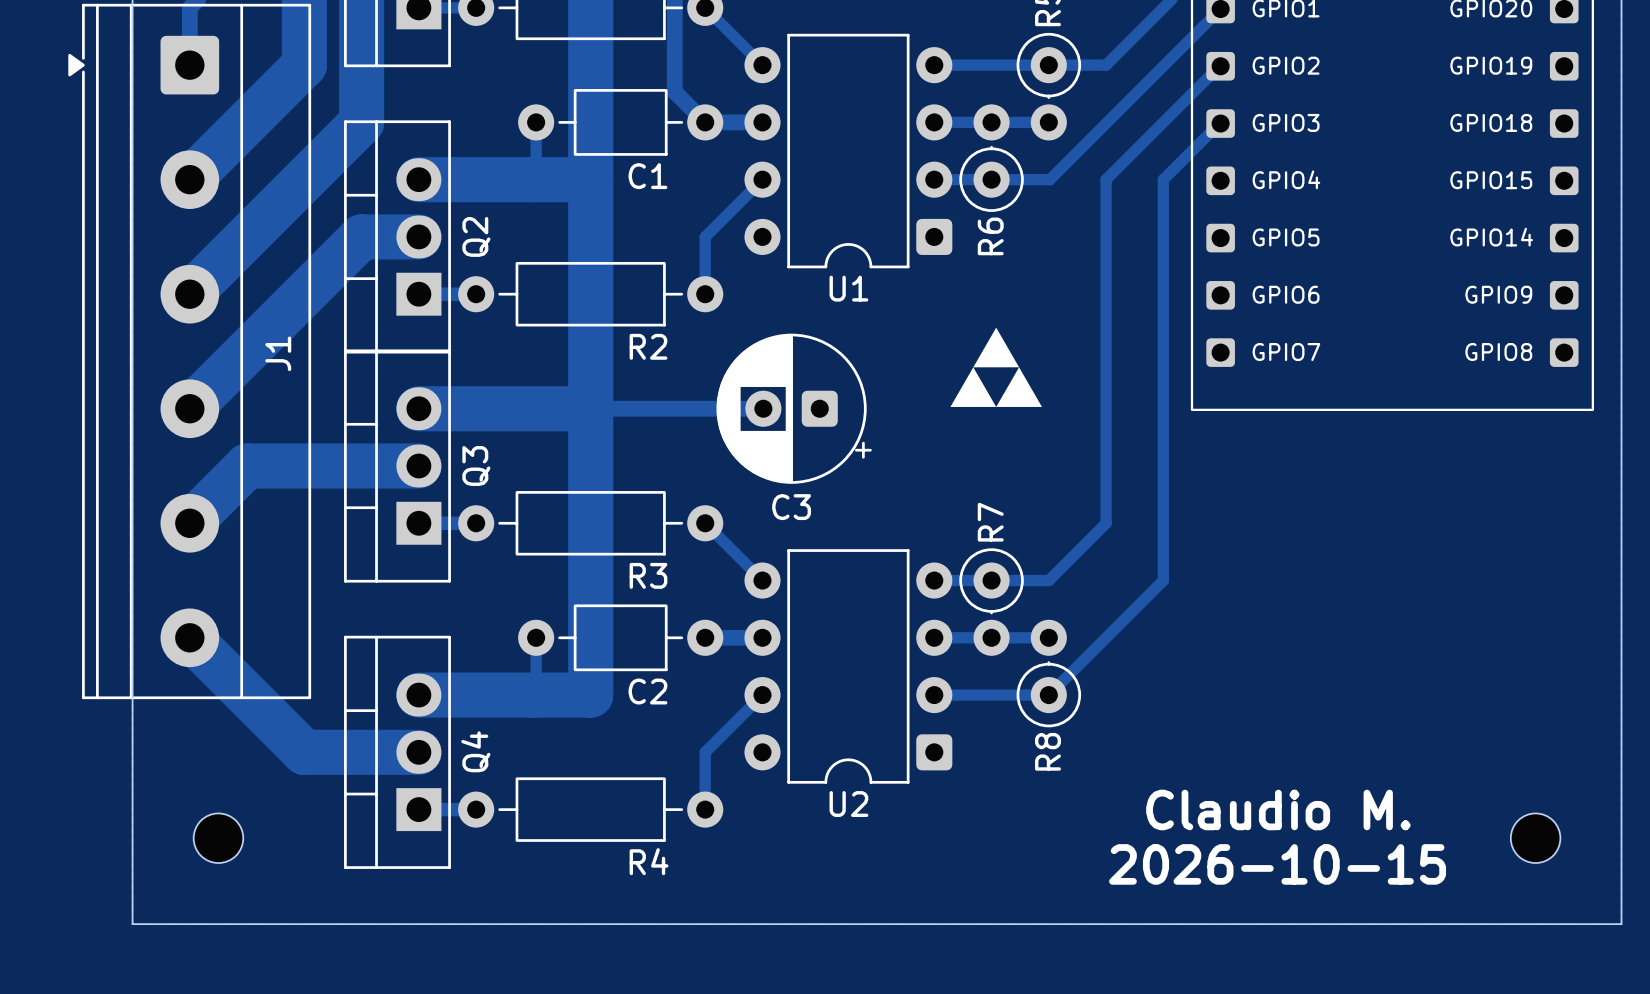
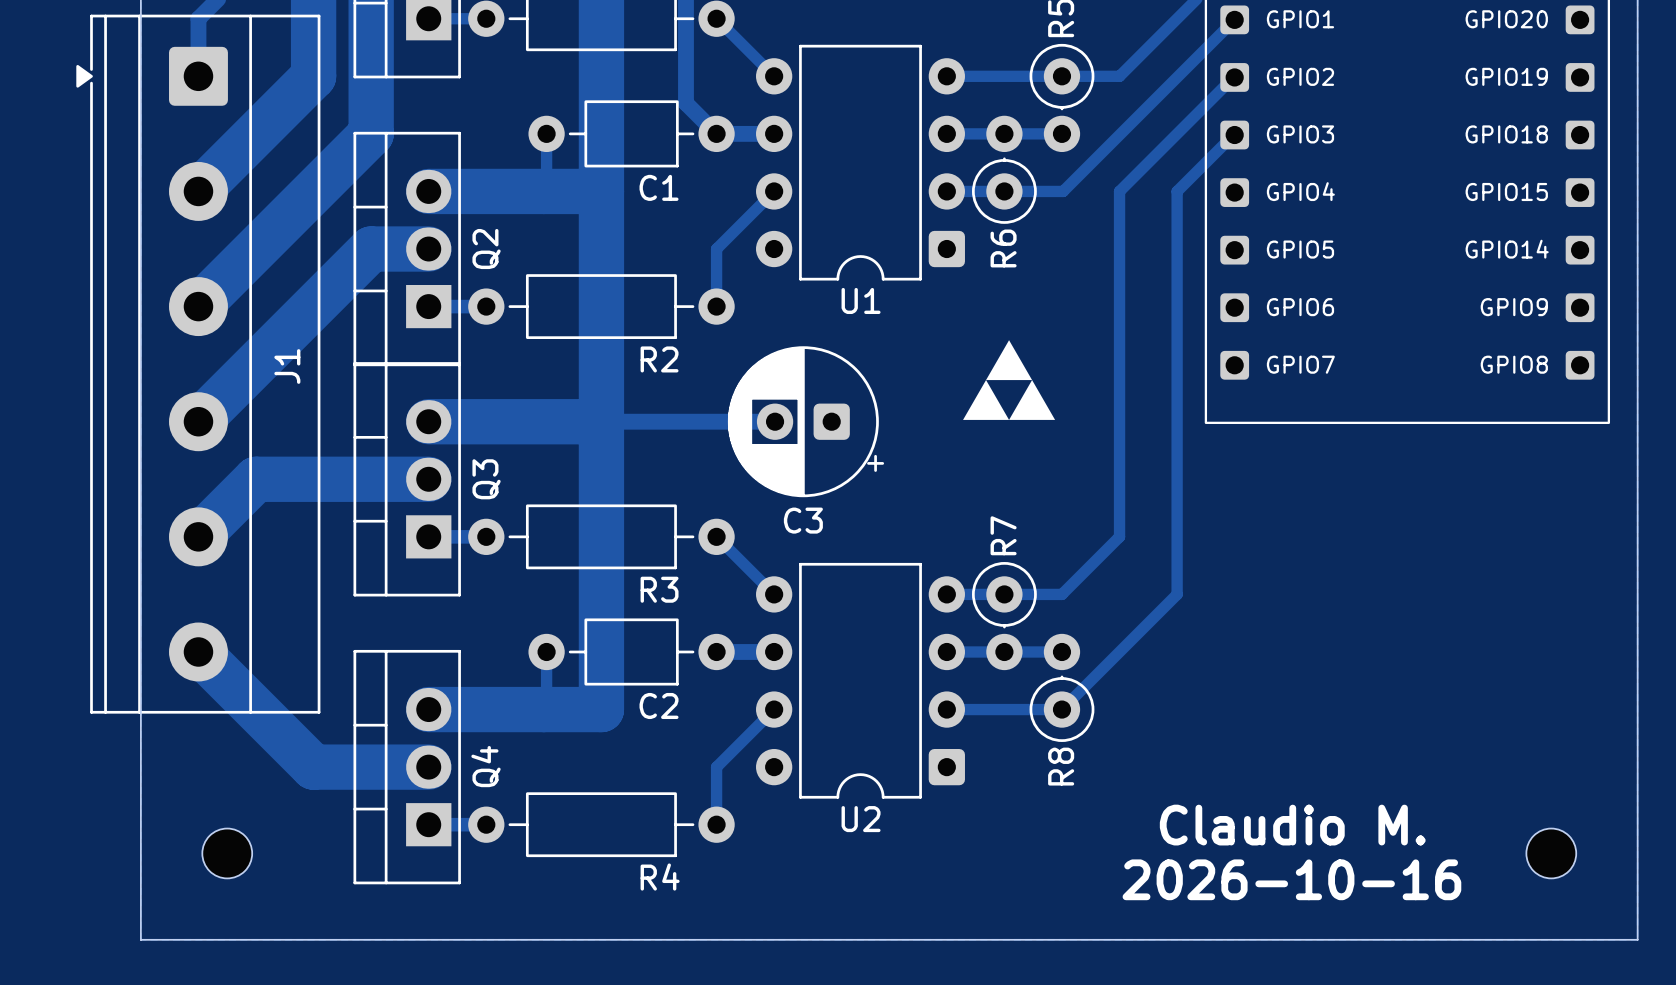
text: 2026-10-15 (1277, 864) -> 2026-10-16 (1291, 879)

